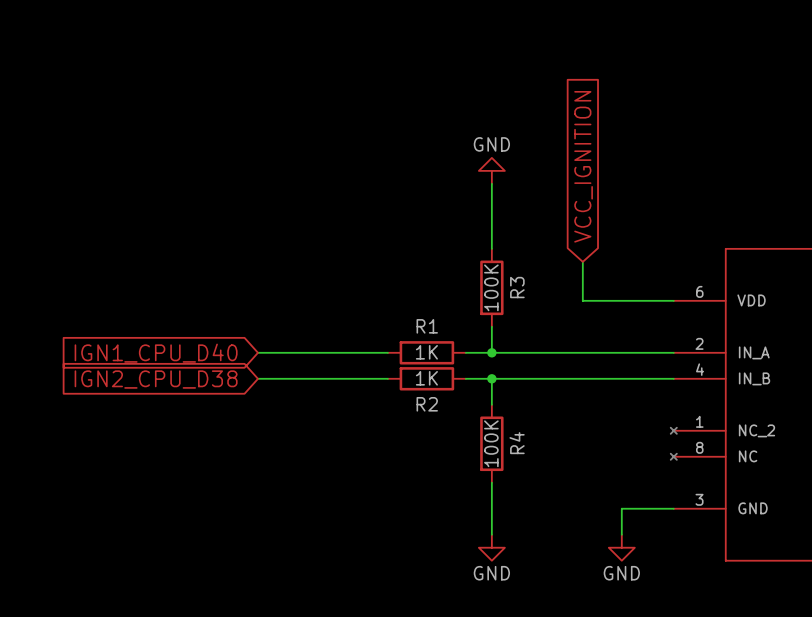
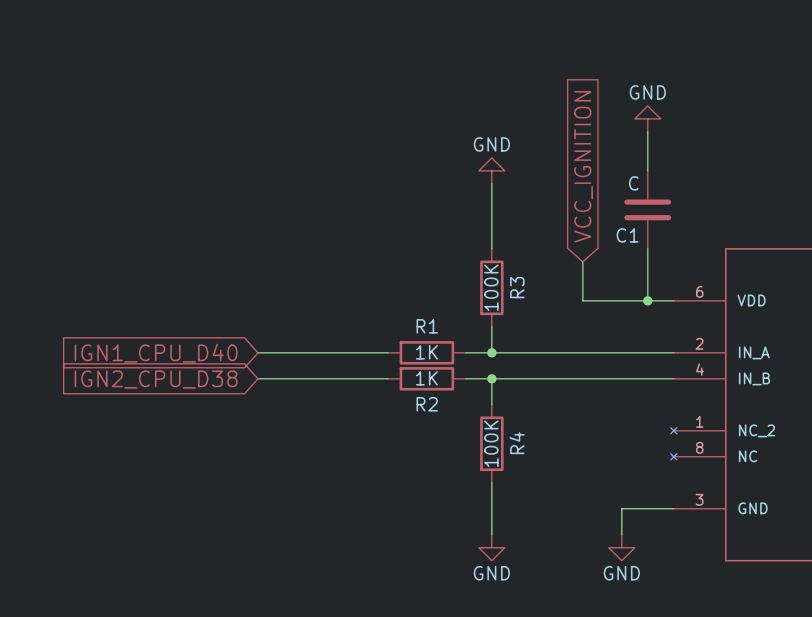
power symbol: none -> GND (647, 118)
wire: none -> (647, 131) (647, 170)
C1: none -> C (647, 209)
wire: none -> (647, 248) (647, 300)
junction: none -> (647, 300)

